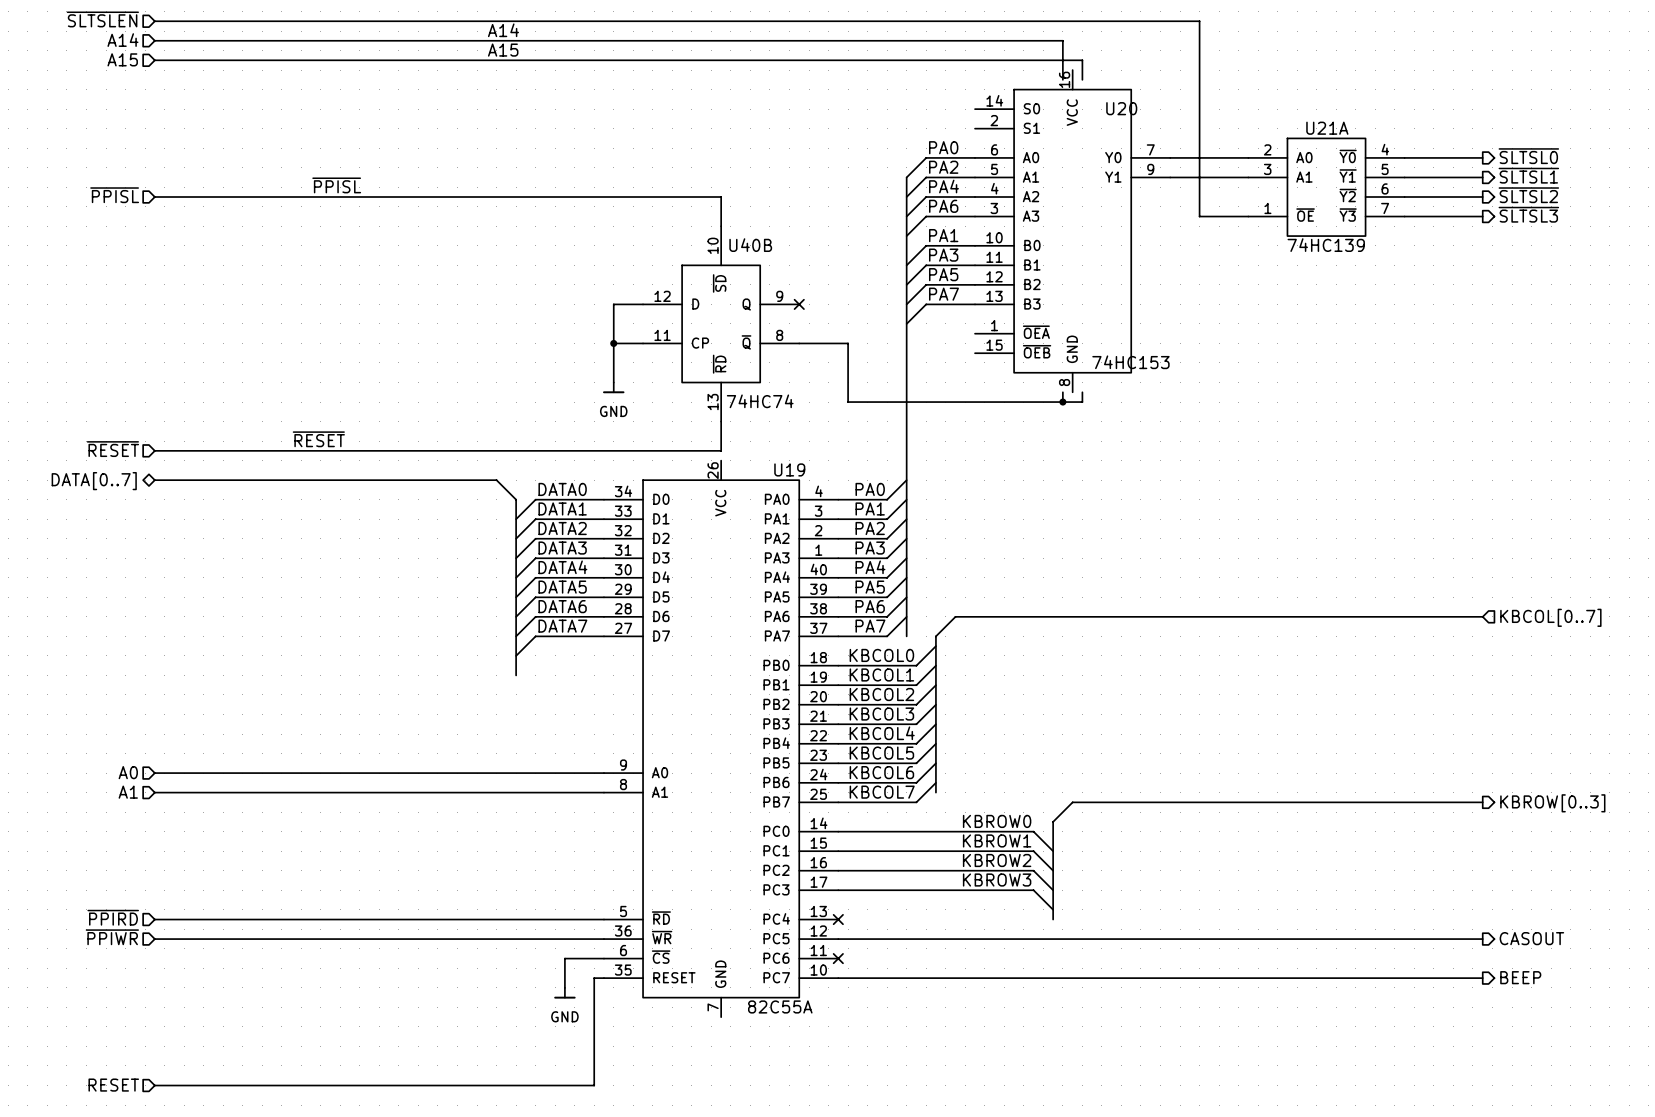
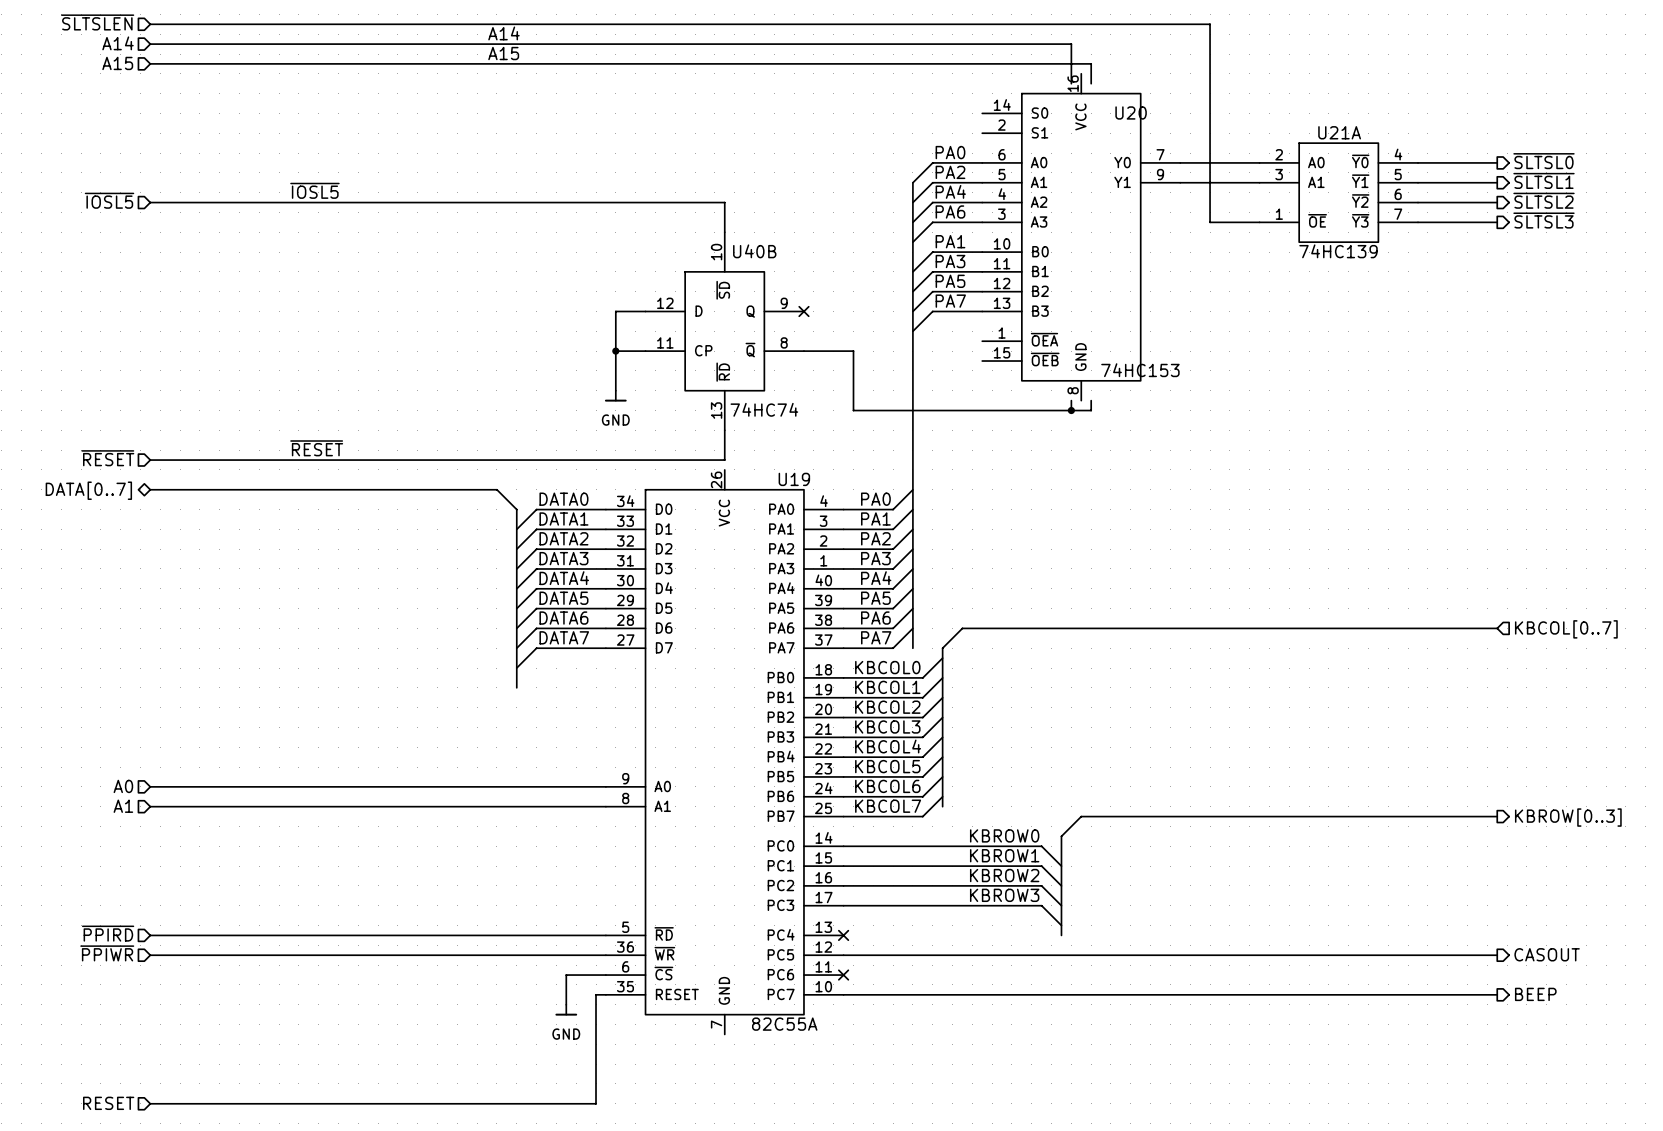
label: ~{PPISL} (336, 185) -> ~{IOSL5} (314, 190)
hierarchical label: ~{PPISL} (114, 195) -> ~{IOSL5} (109, 200)

